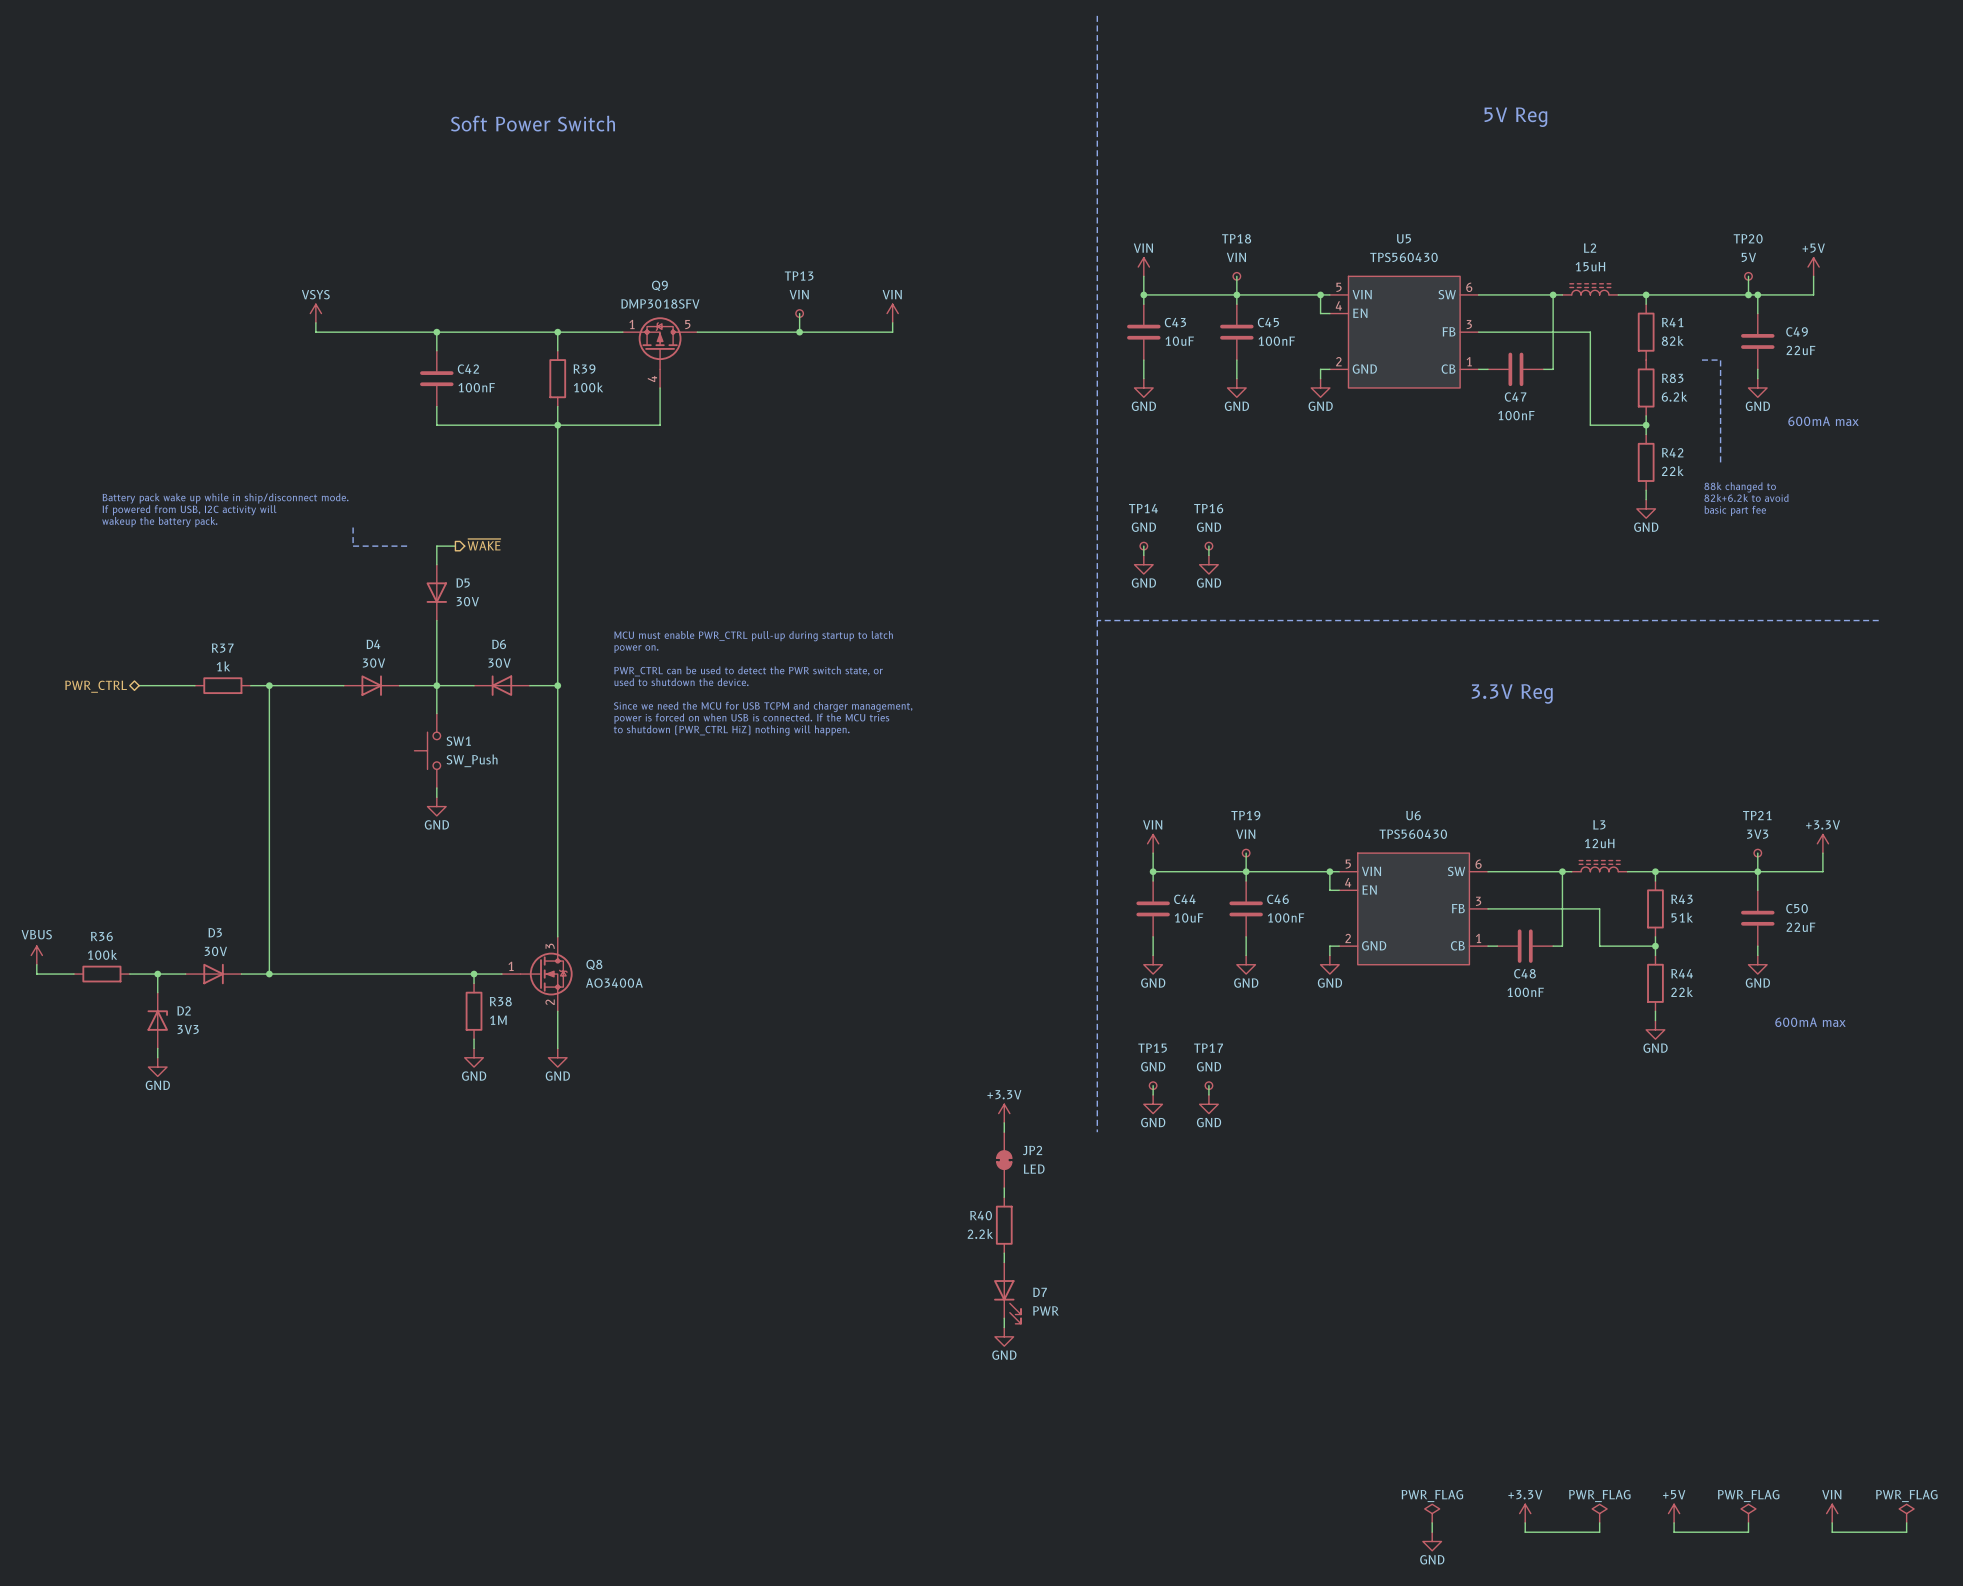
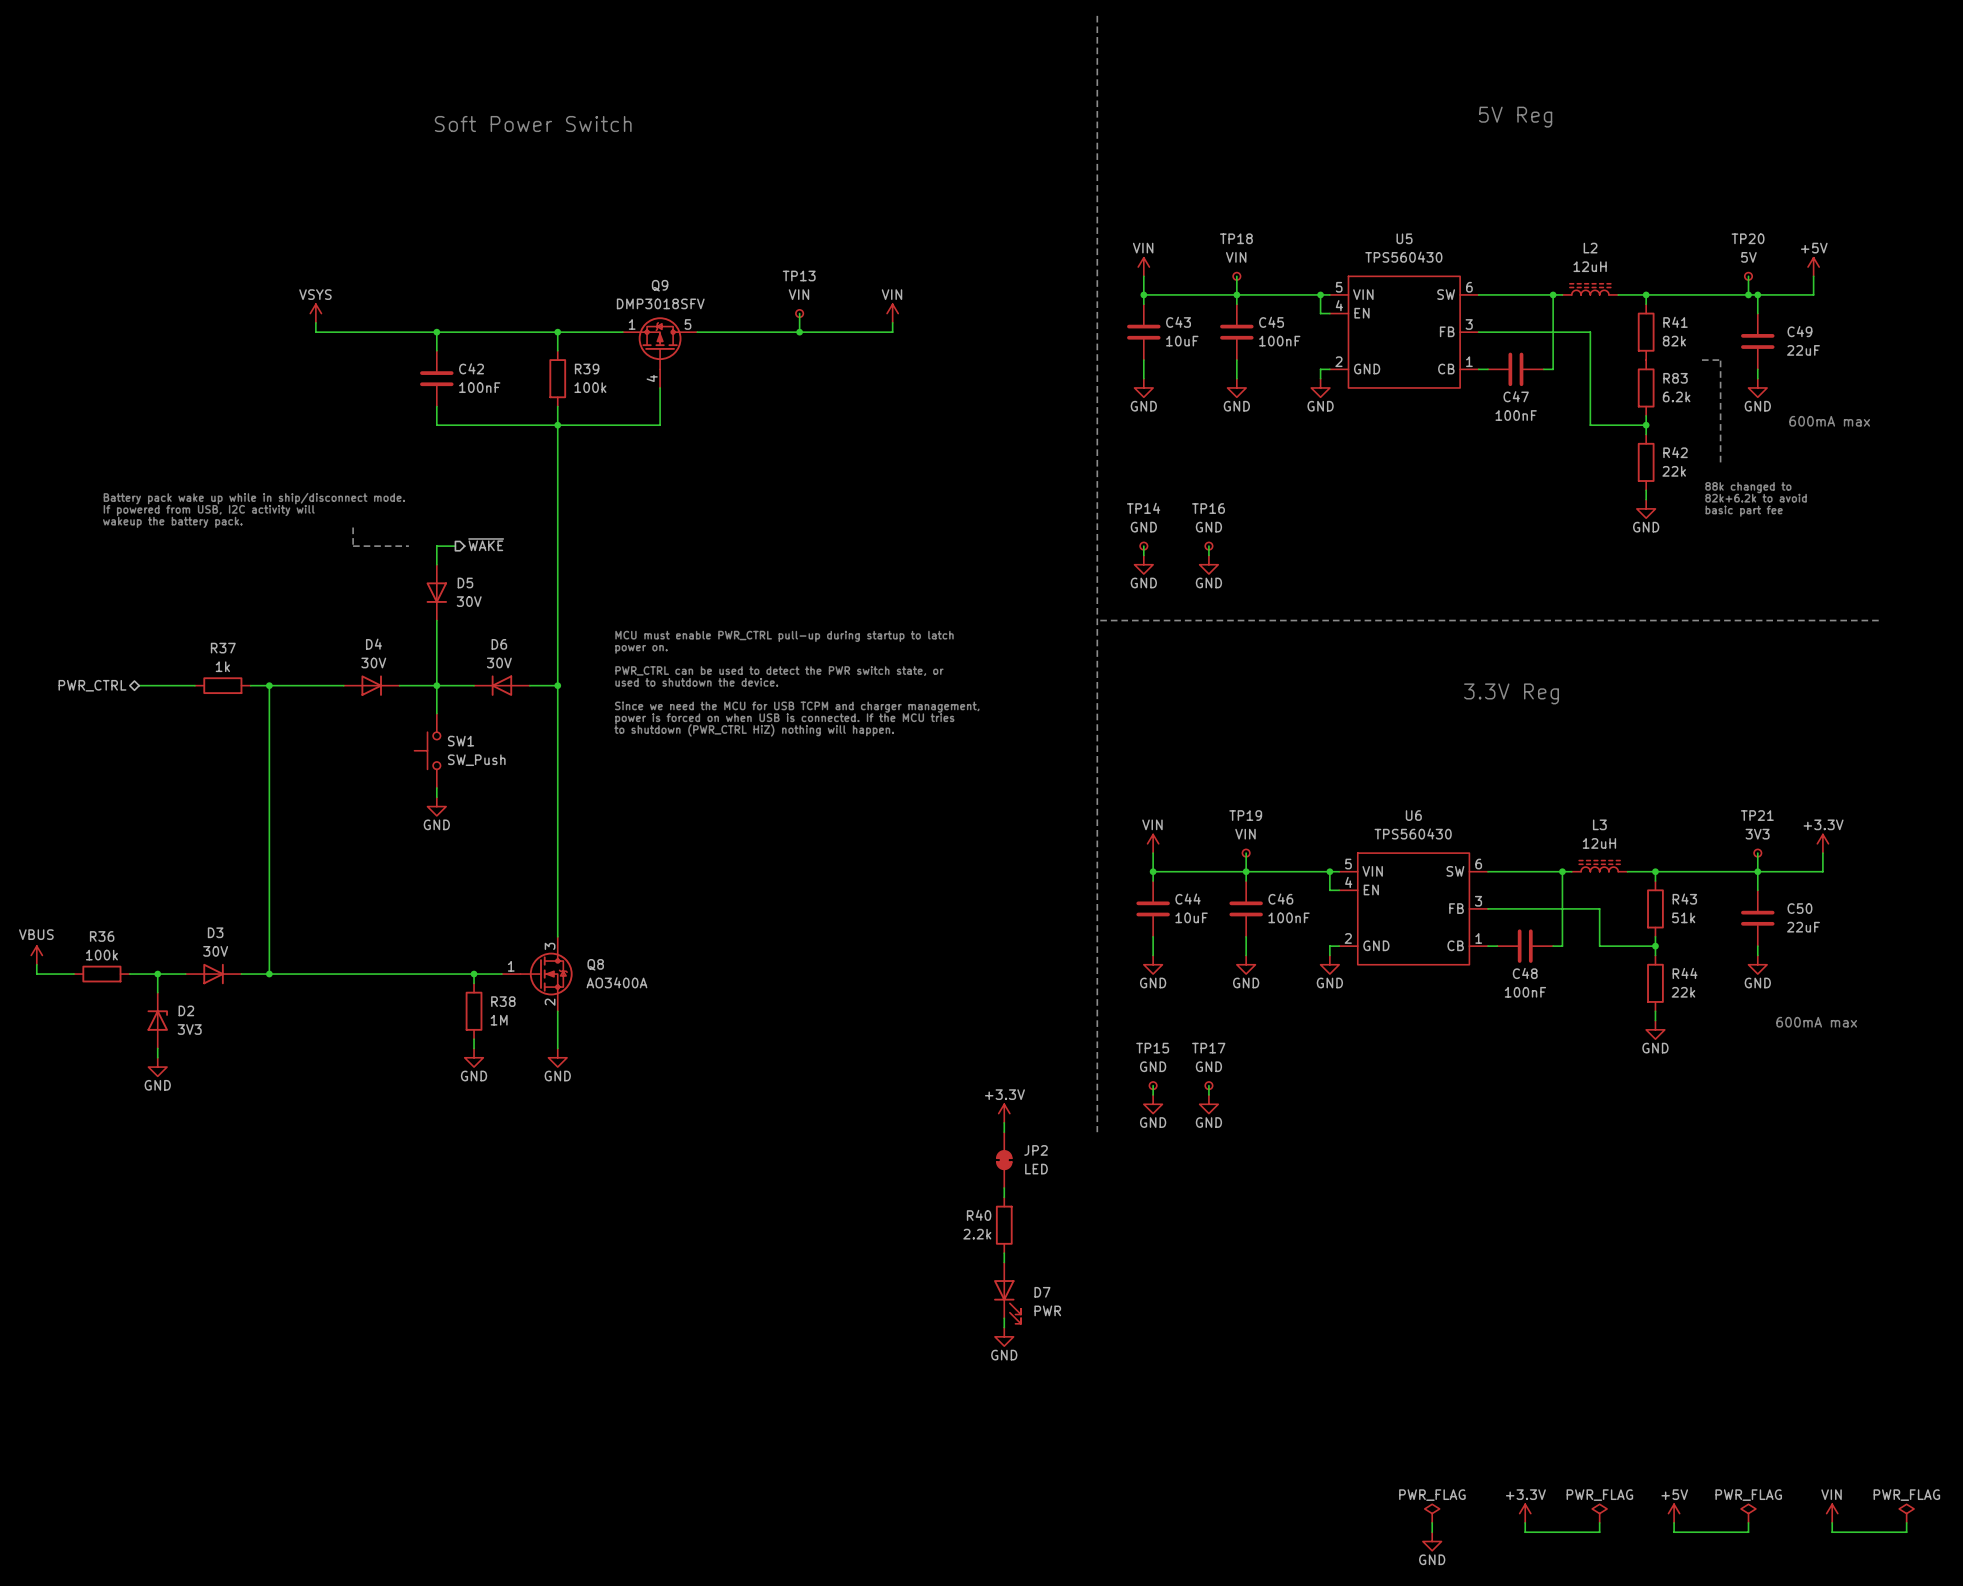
L2 value: 15uH (1590, 266) -> 12uH (1590, 266)

